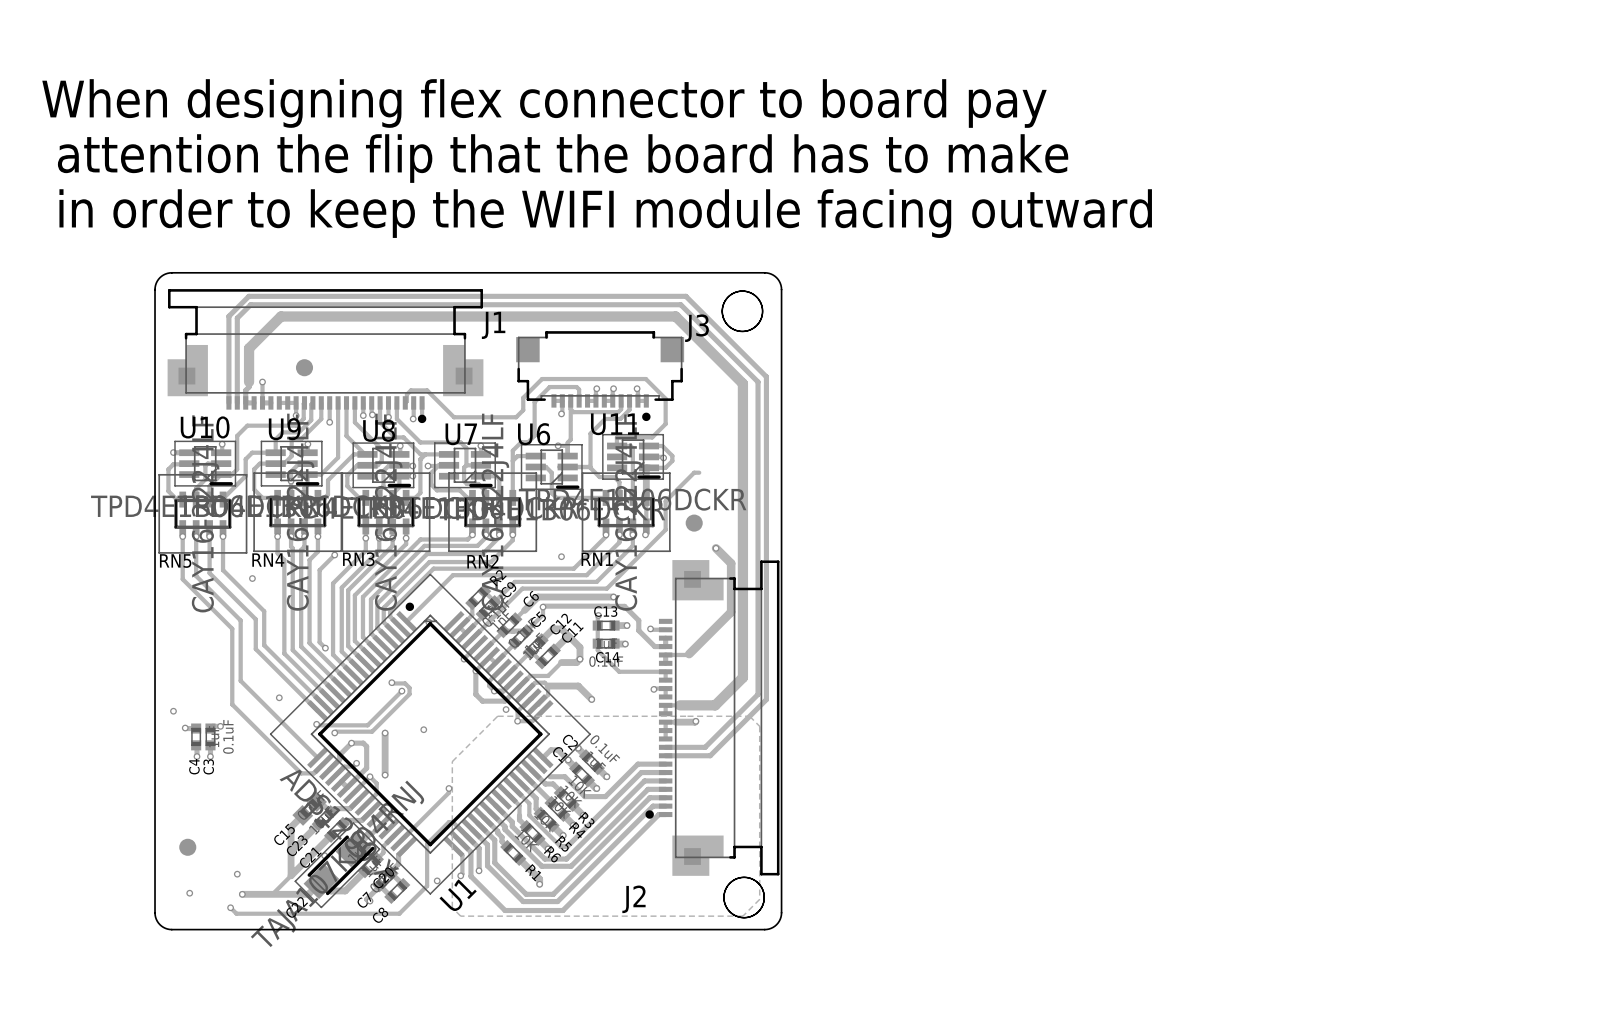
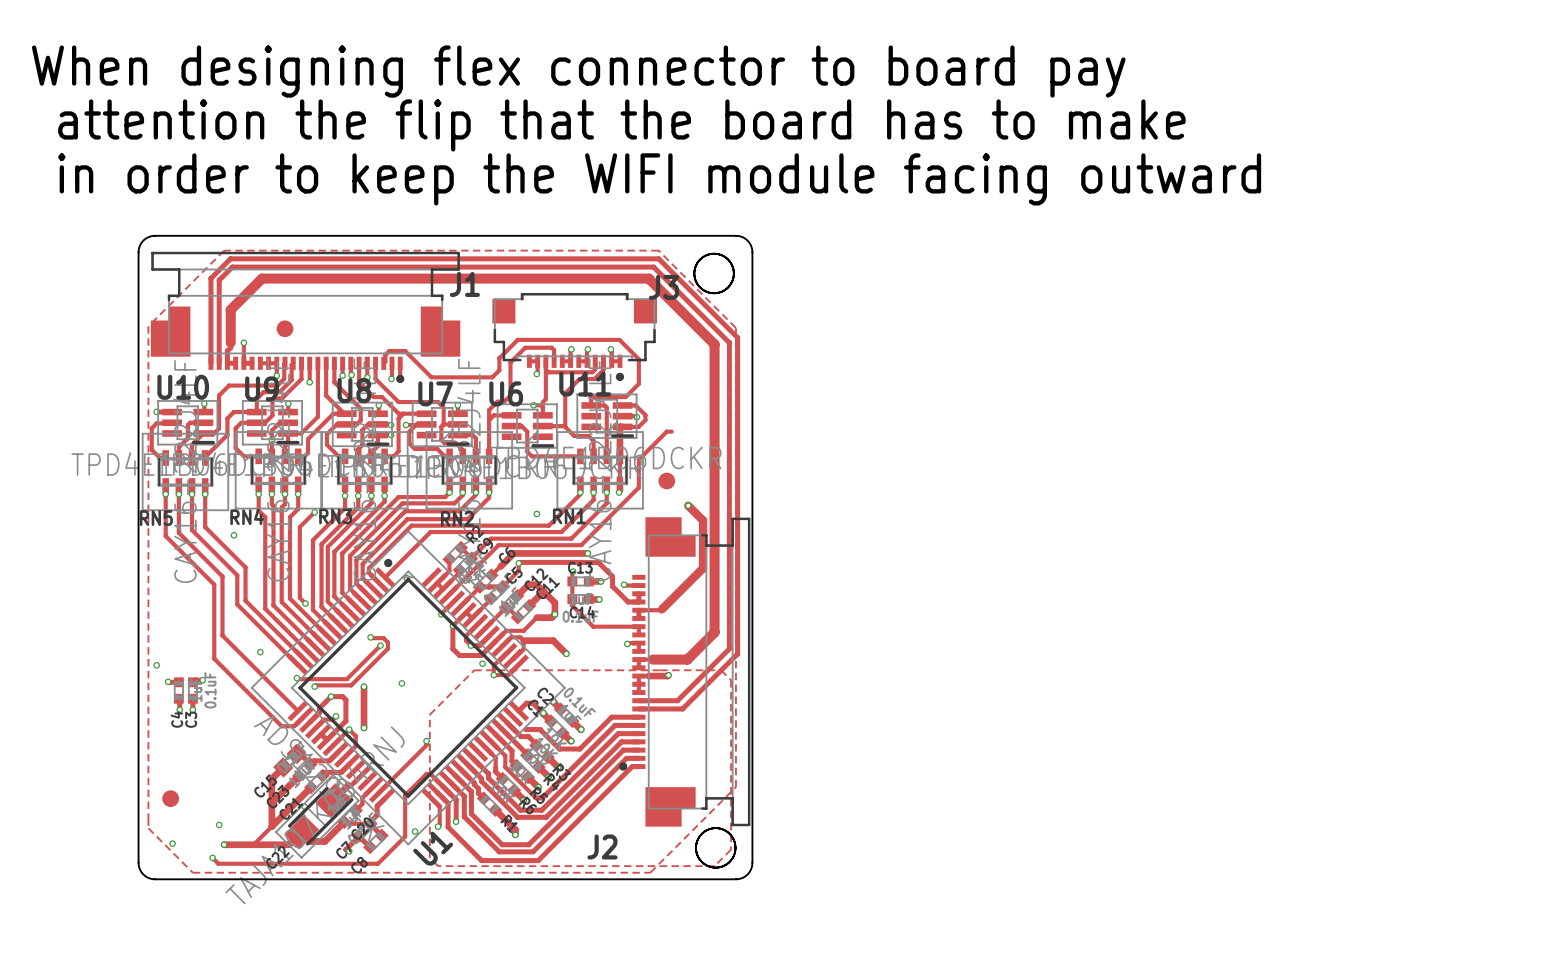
zone outline: none -> (224, 250) (658, 250) (735, 327) (735, 787) (650, 872) (192, 872) (148, 828) (148, 326) (224, 250)

